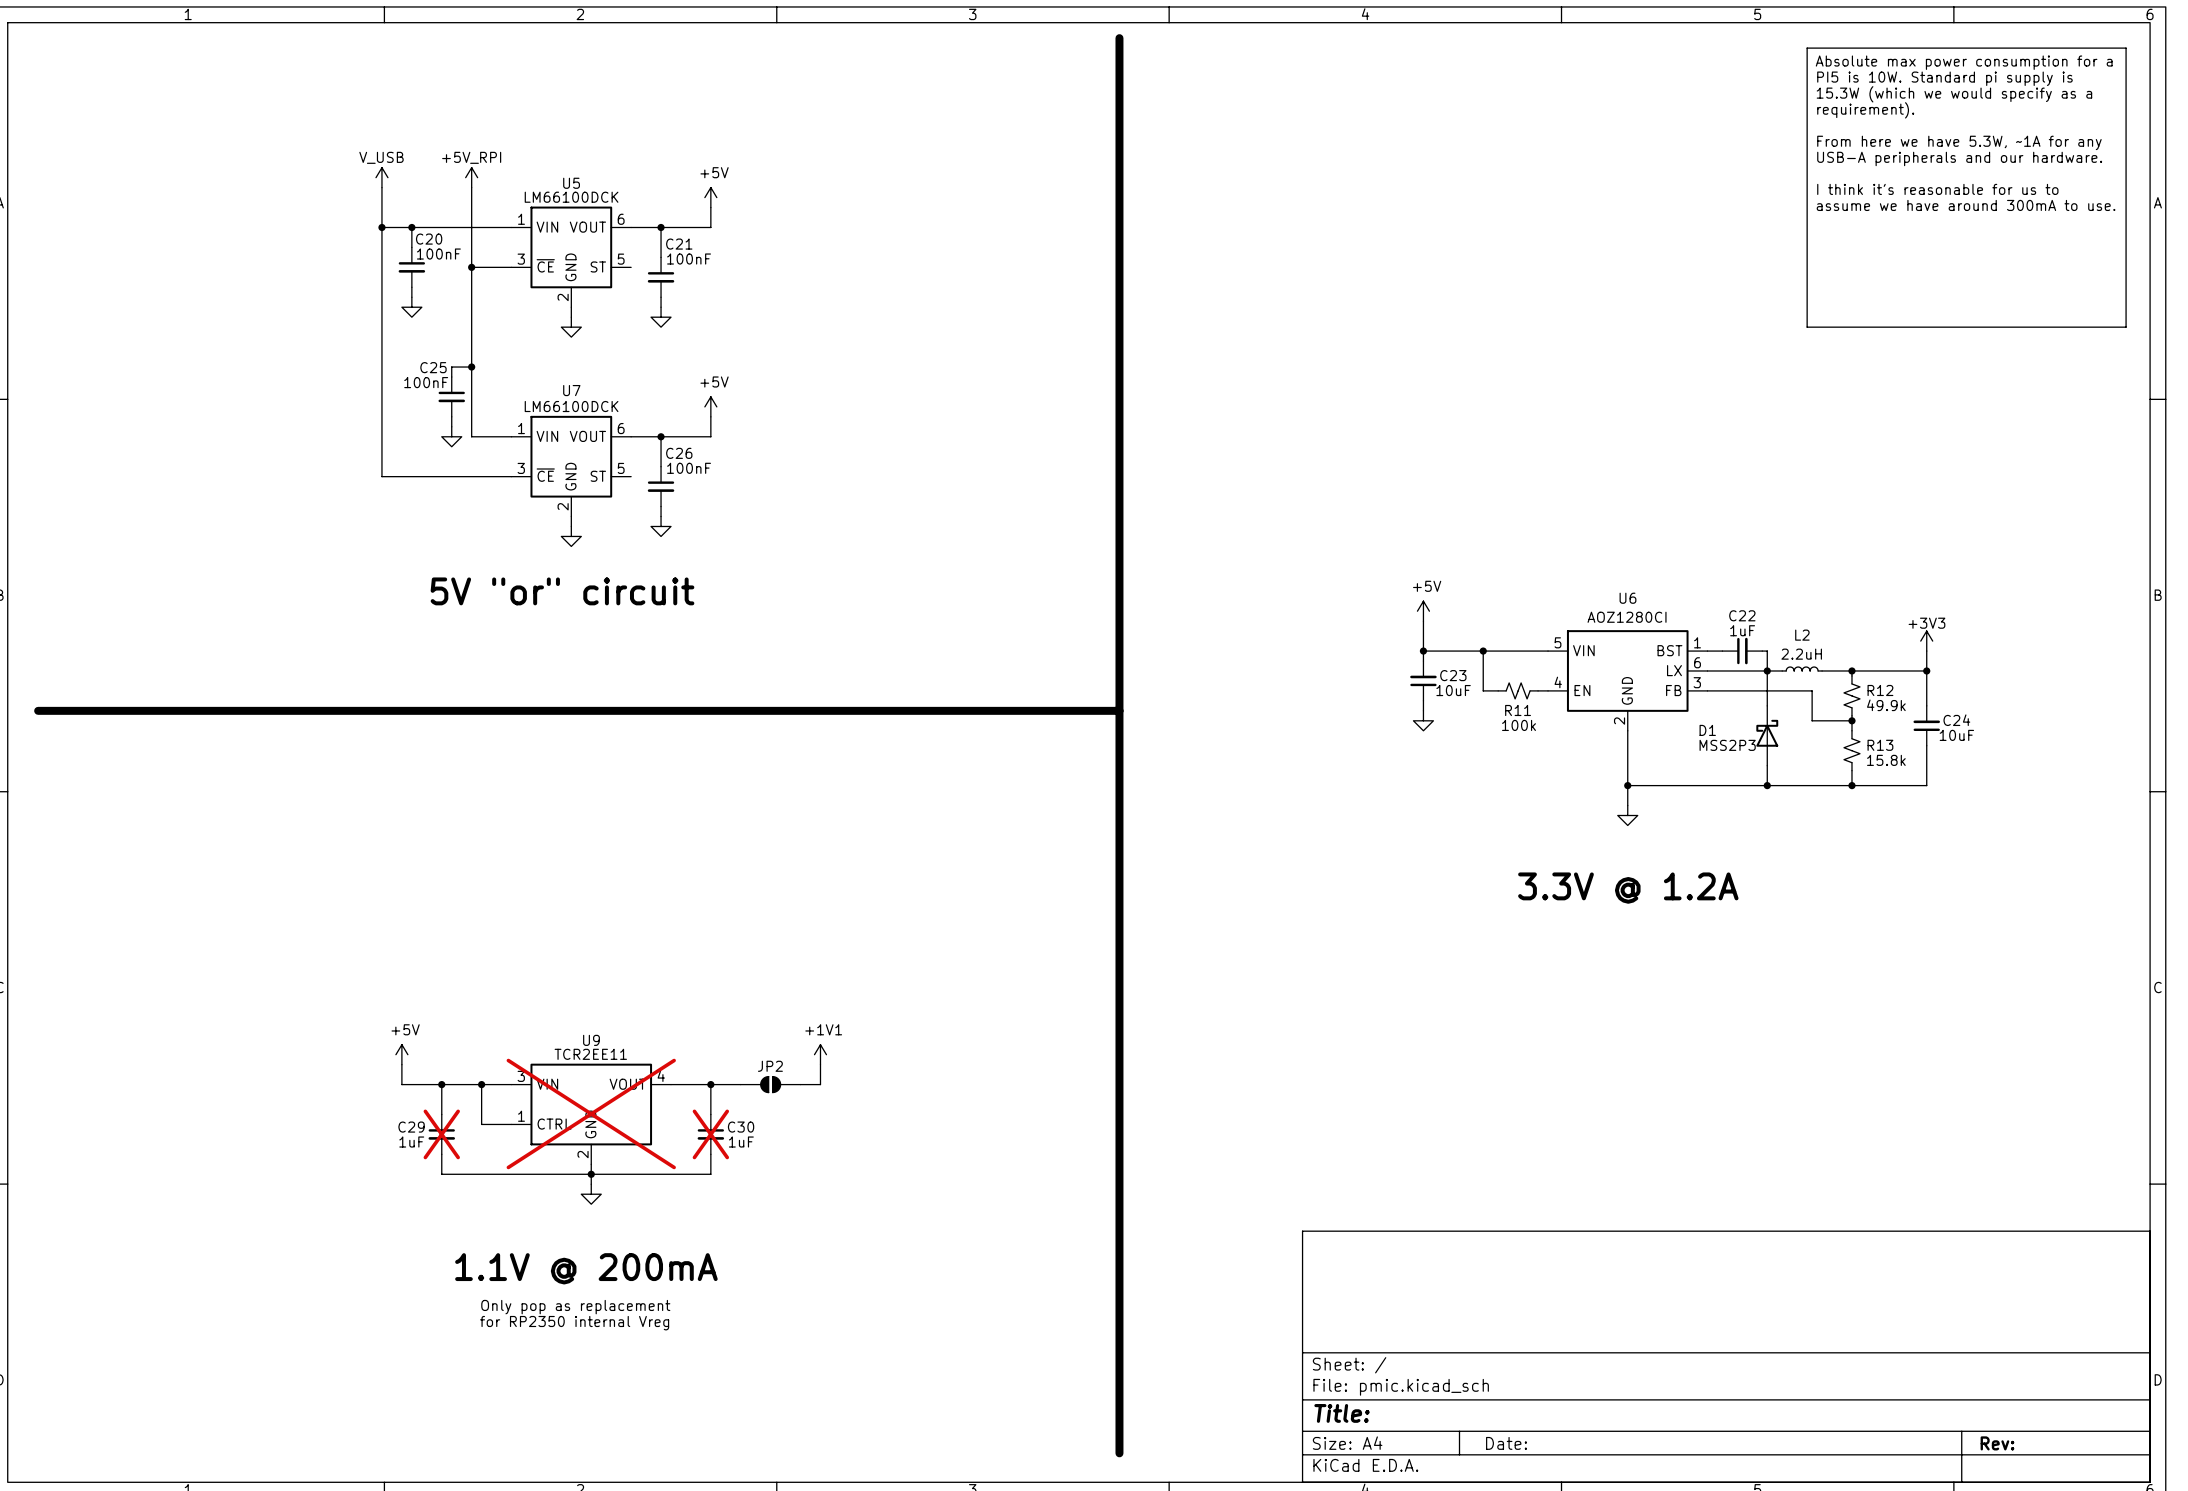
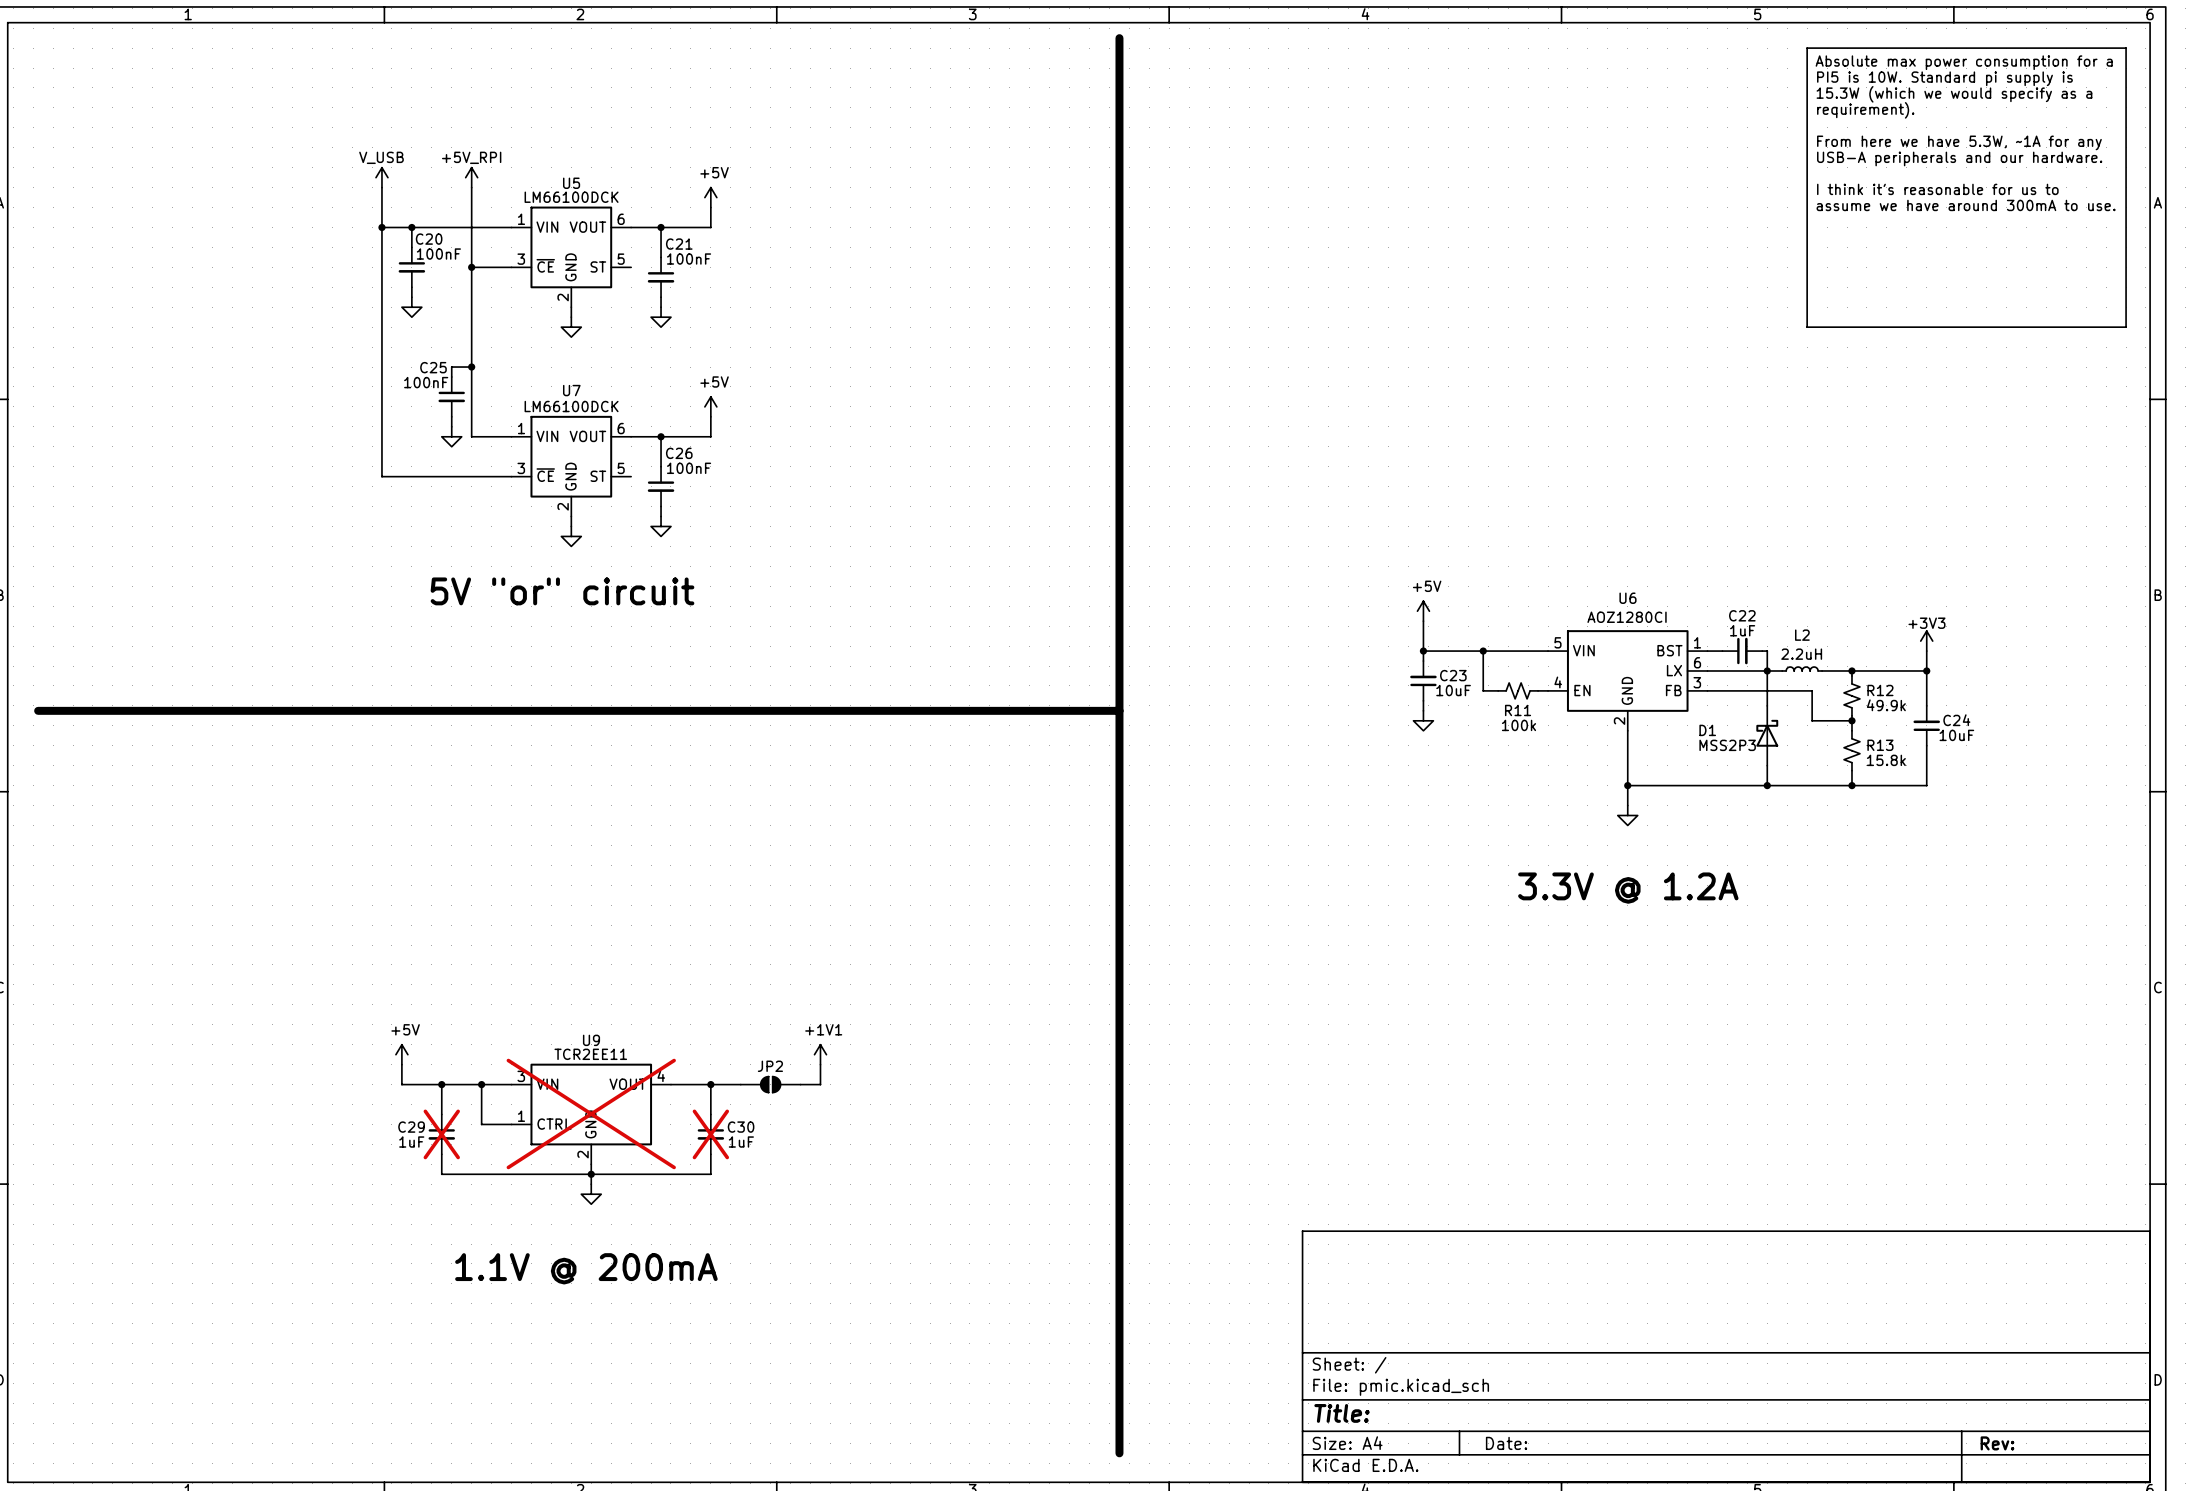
text: Only pop as replacement (575, 1307) -> none
text: for RP2350 internal Vreg (574, 1323) -> none

